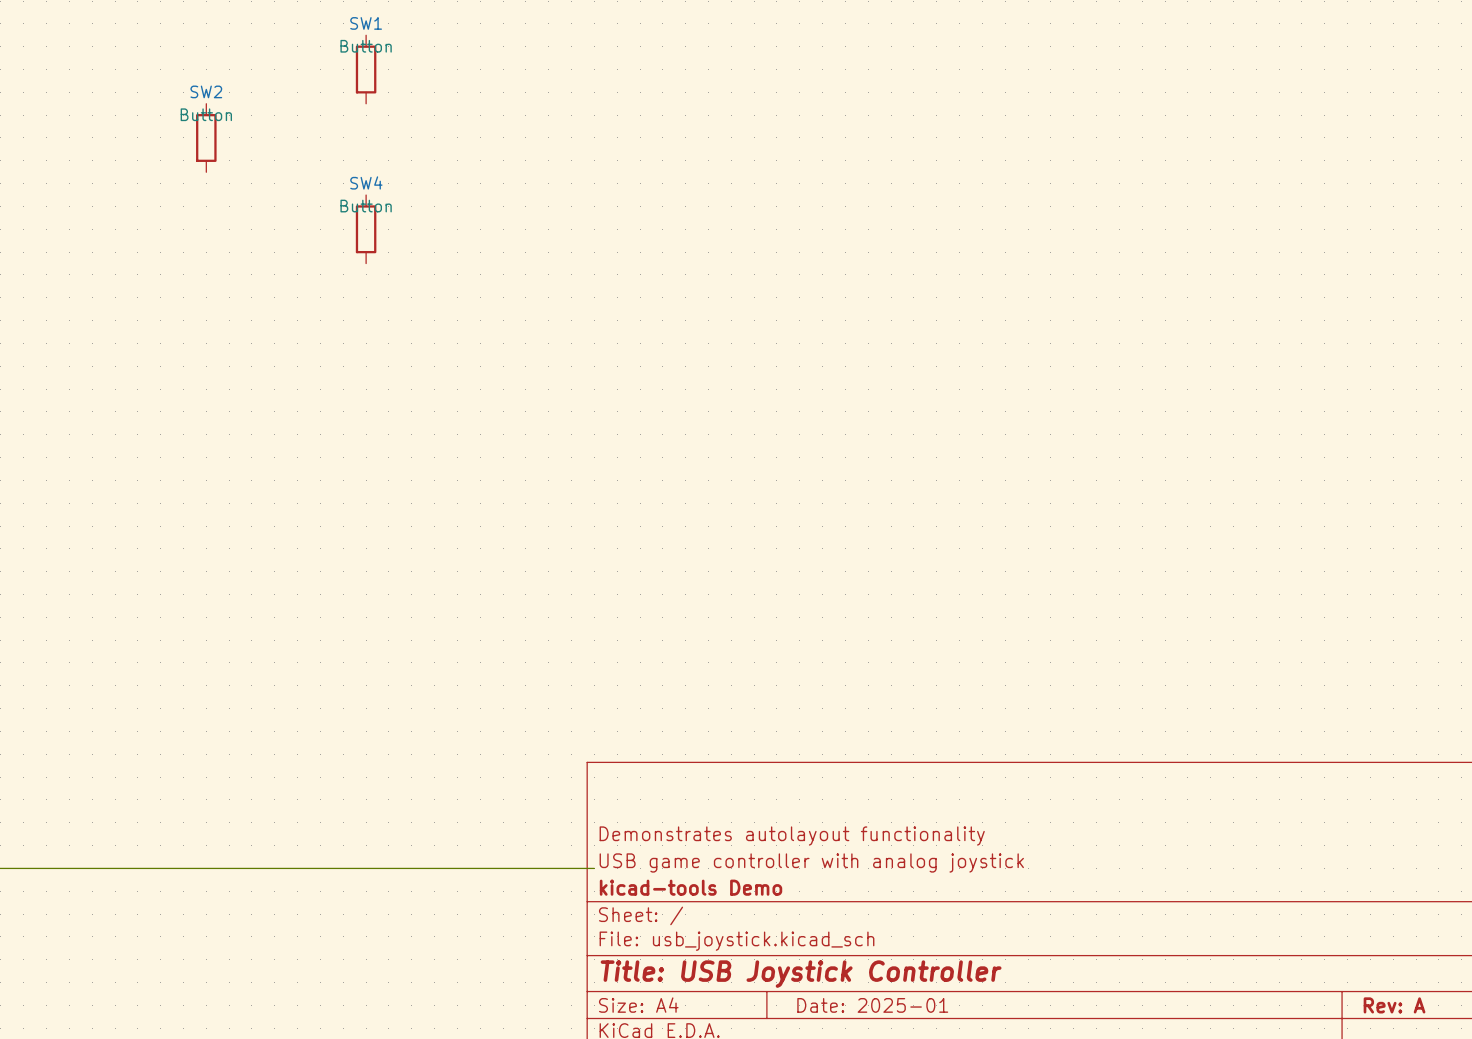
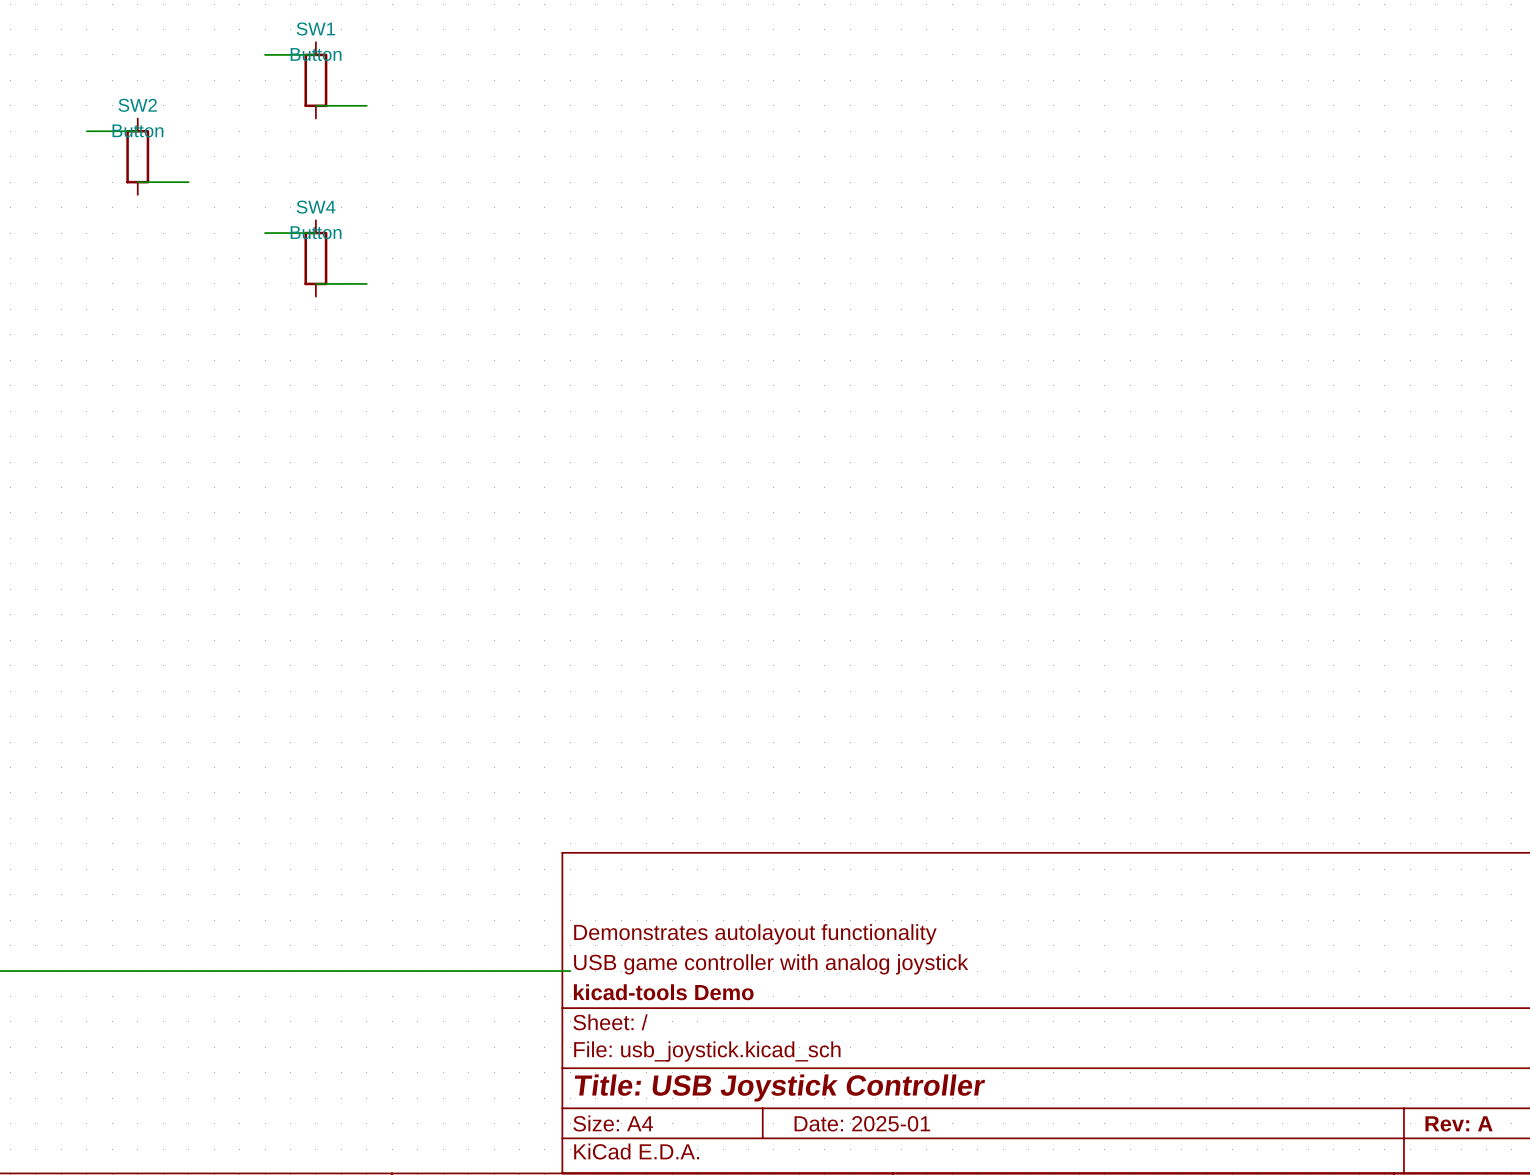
wire: none -> (265, 54) (315, 54)
wire: none -> (315, 105) (366, 105)
wire: none -> (86, 131) (137, 131)
wire: none -> (137, 182) (188, 182)
wire: none -> (265, 233) (315, 233)
wire: none -> (315, 283) (366, 283)

